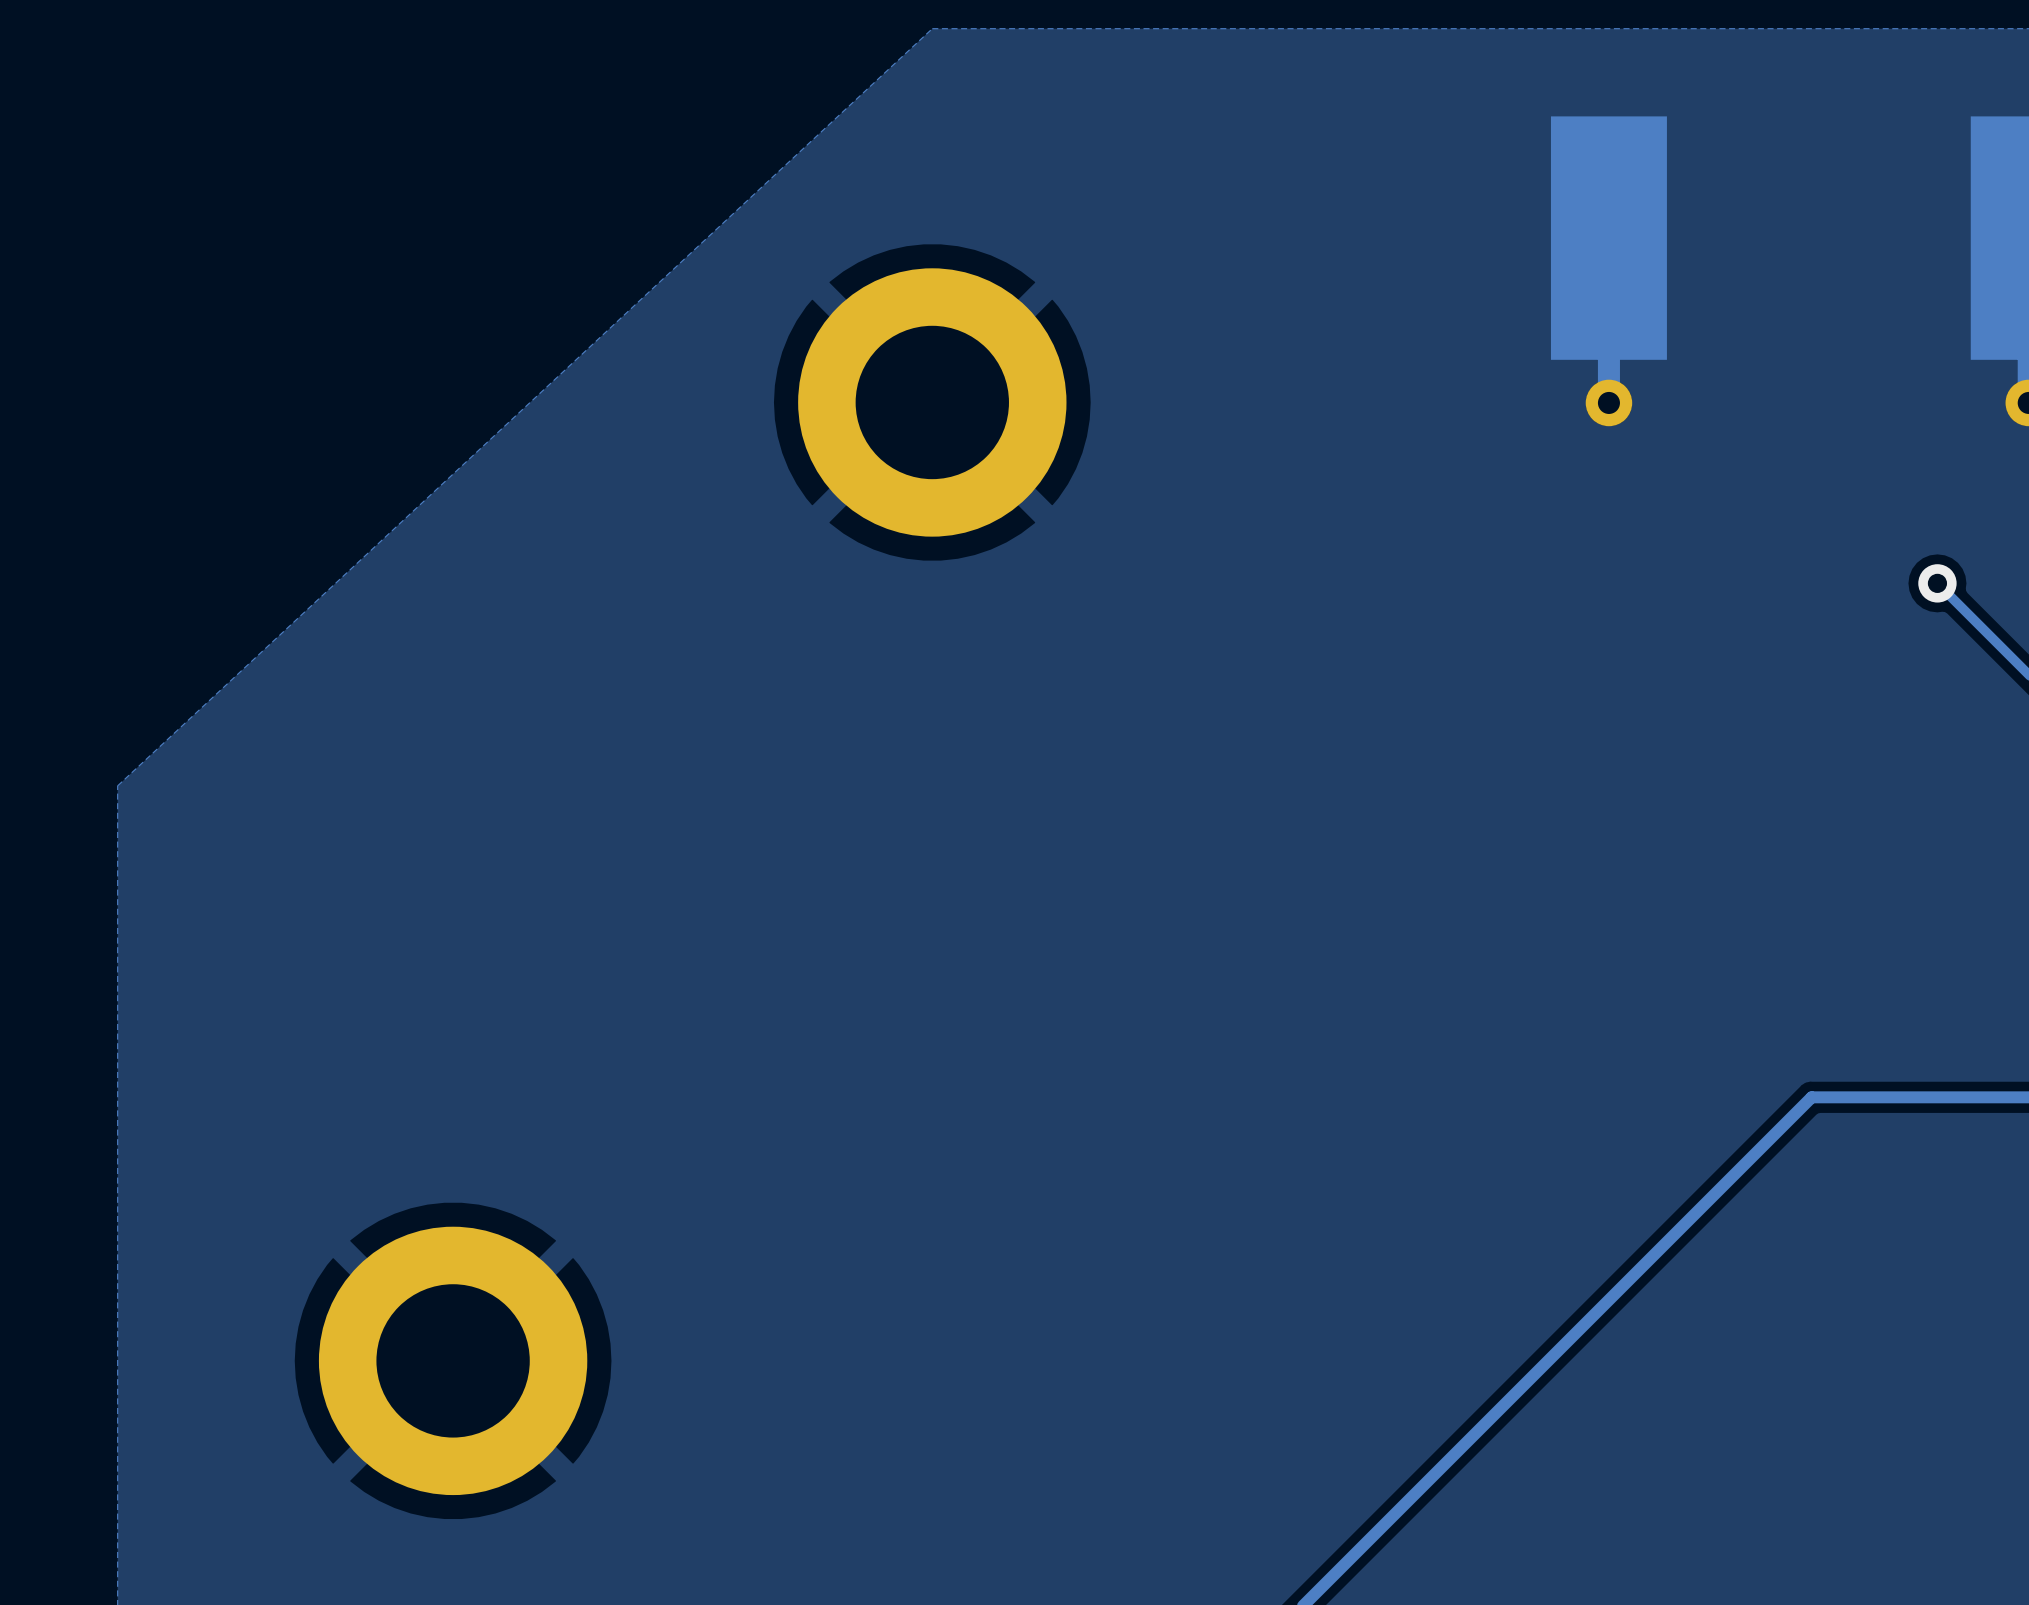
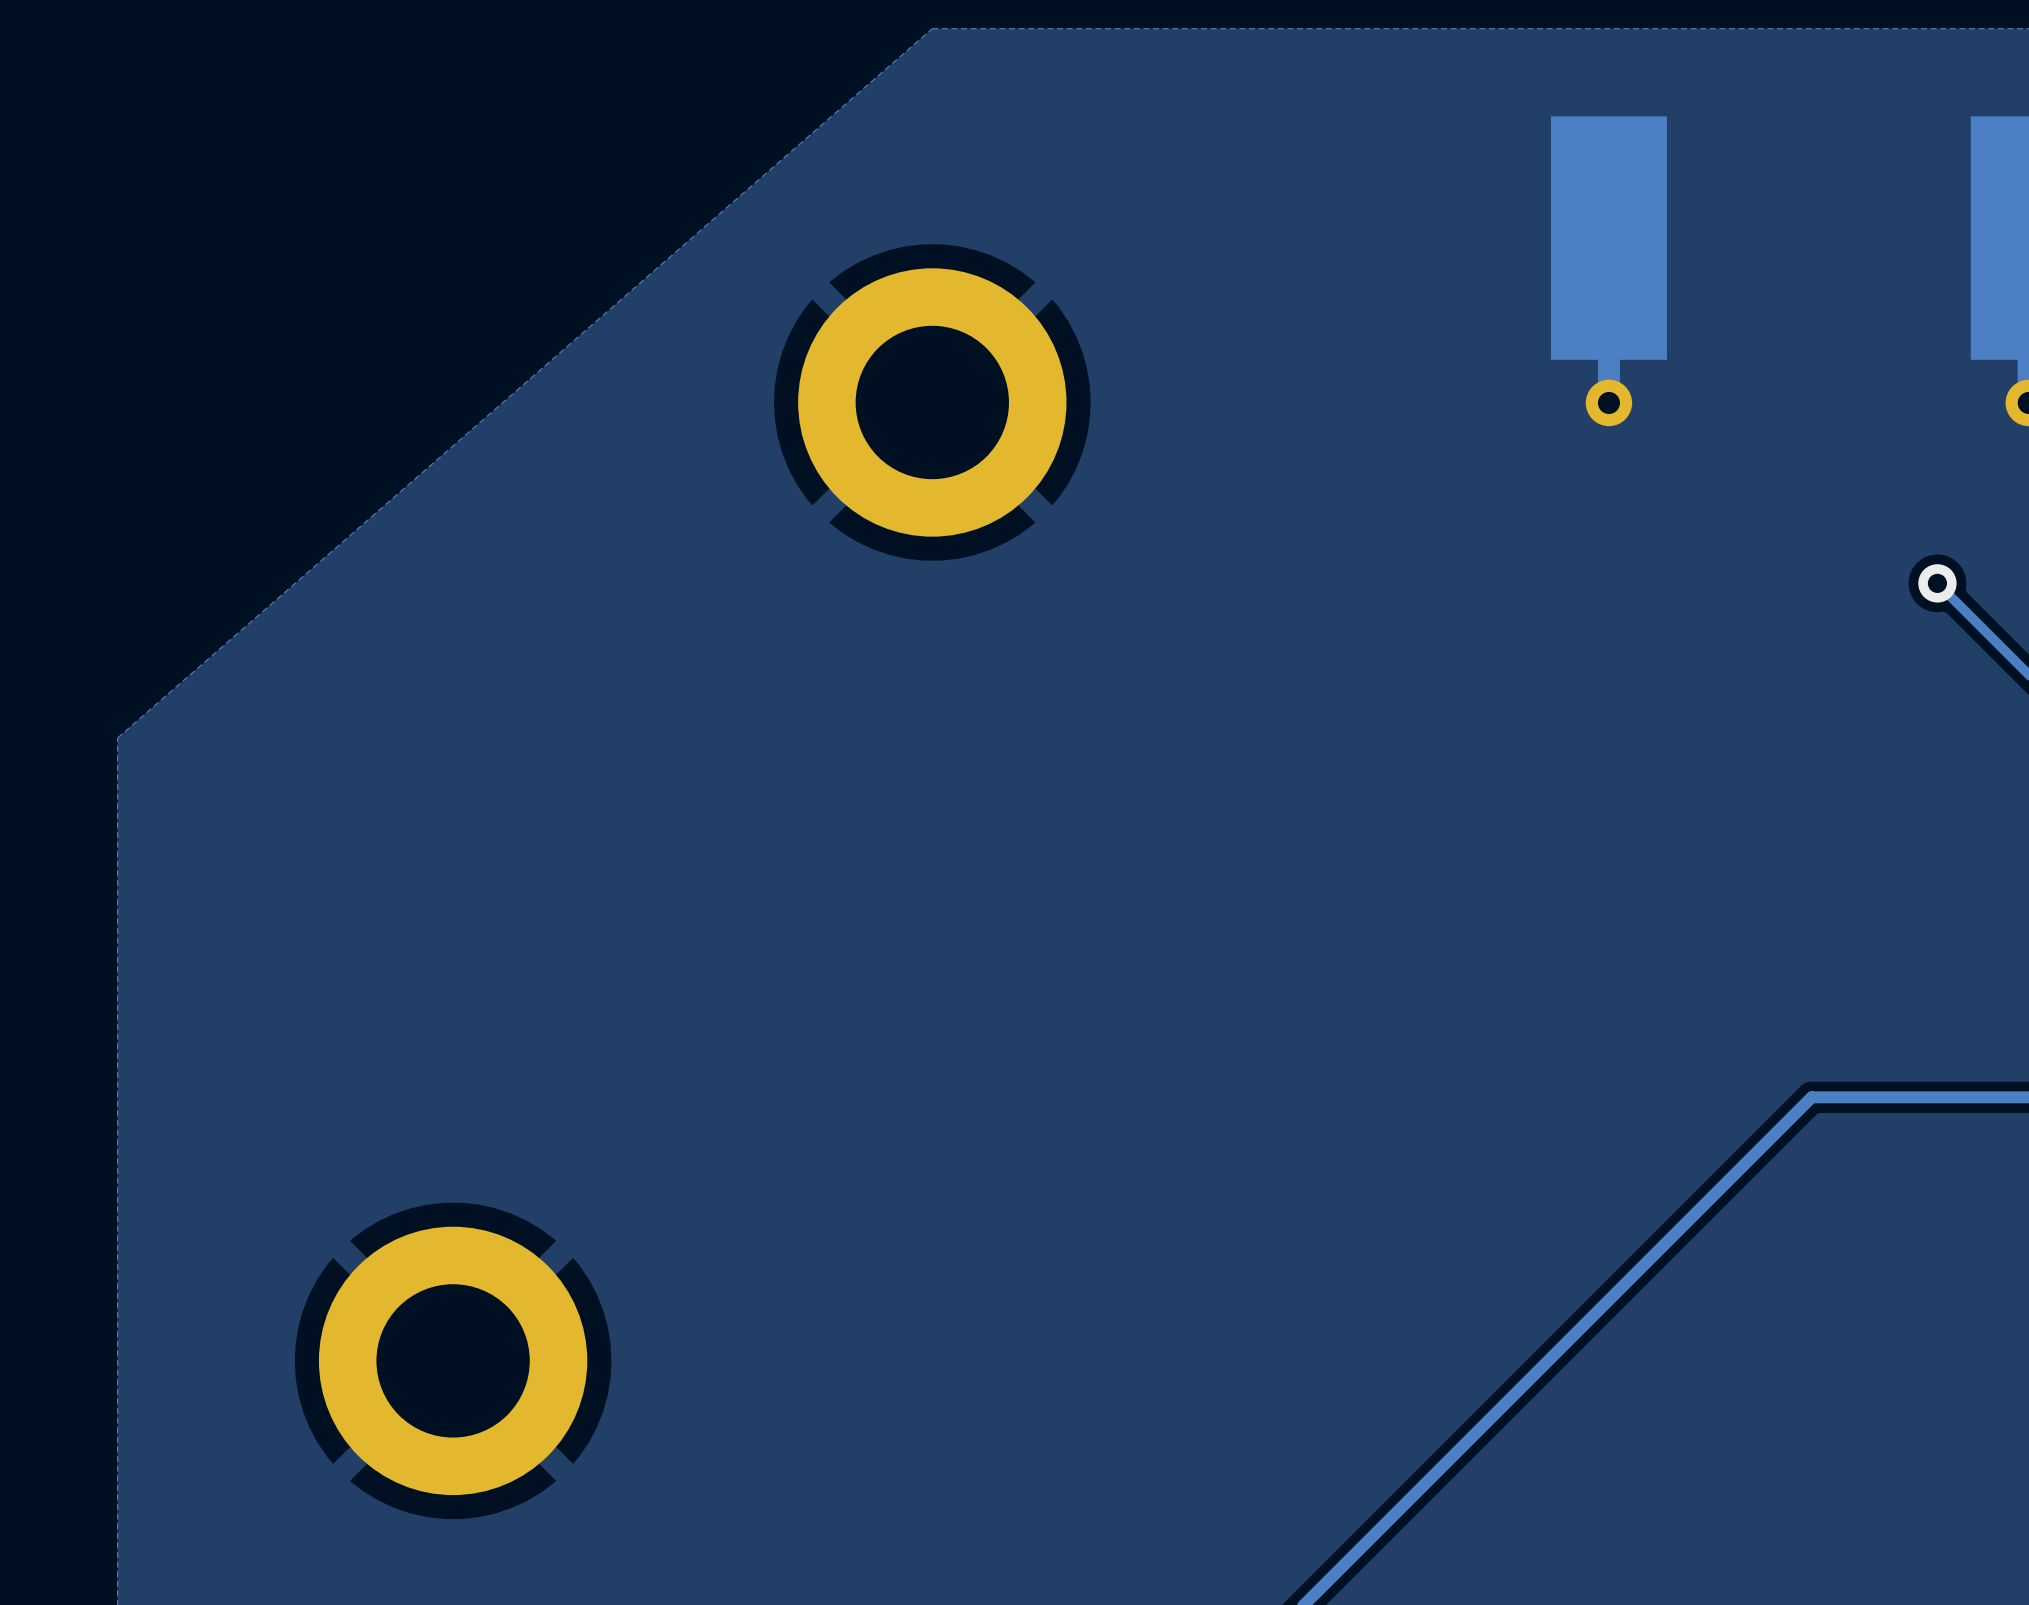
zone outline: (932, 28) (117, 785) -> (932, 28) (117, 737) (117, 785)

